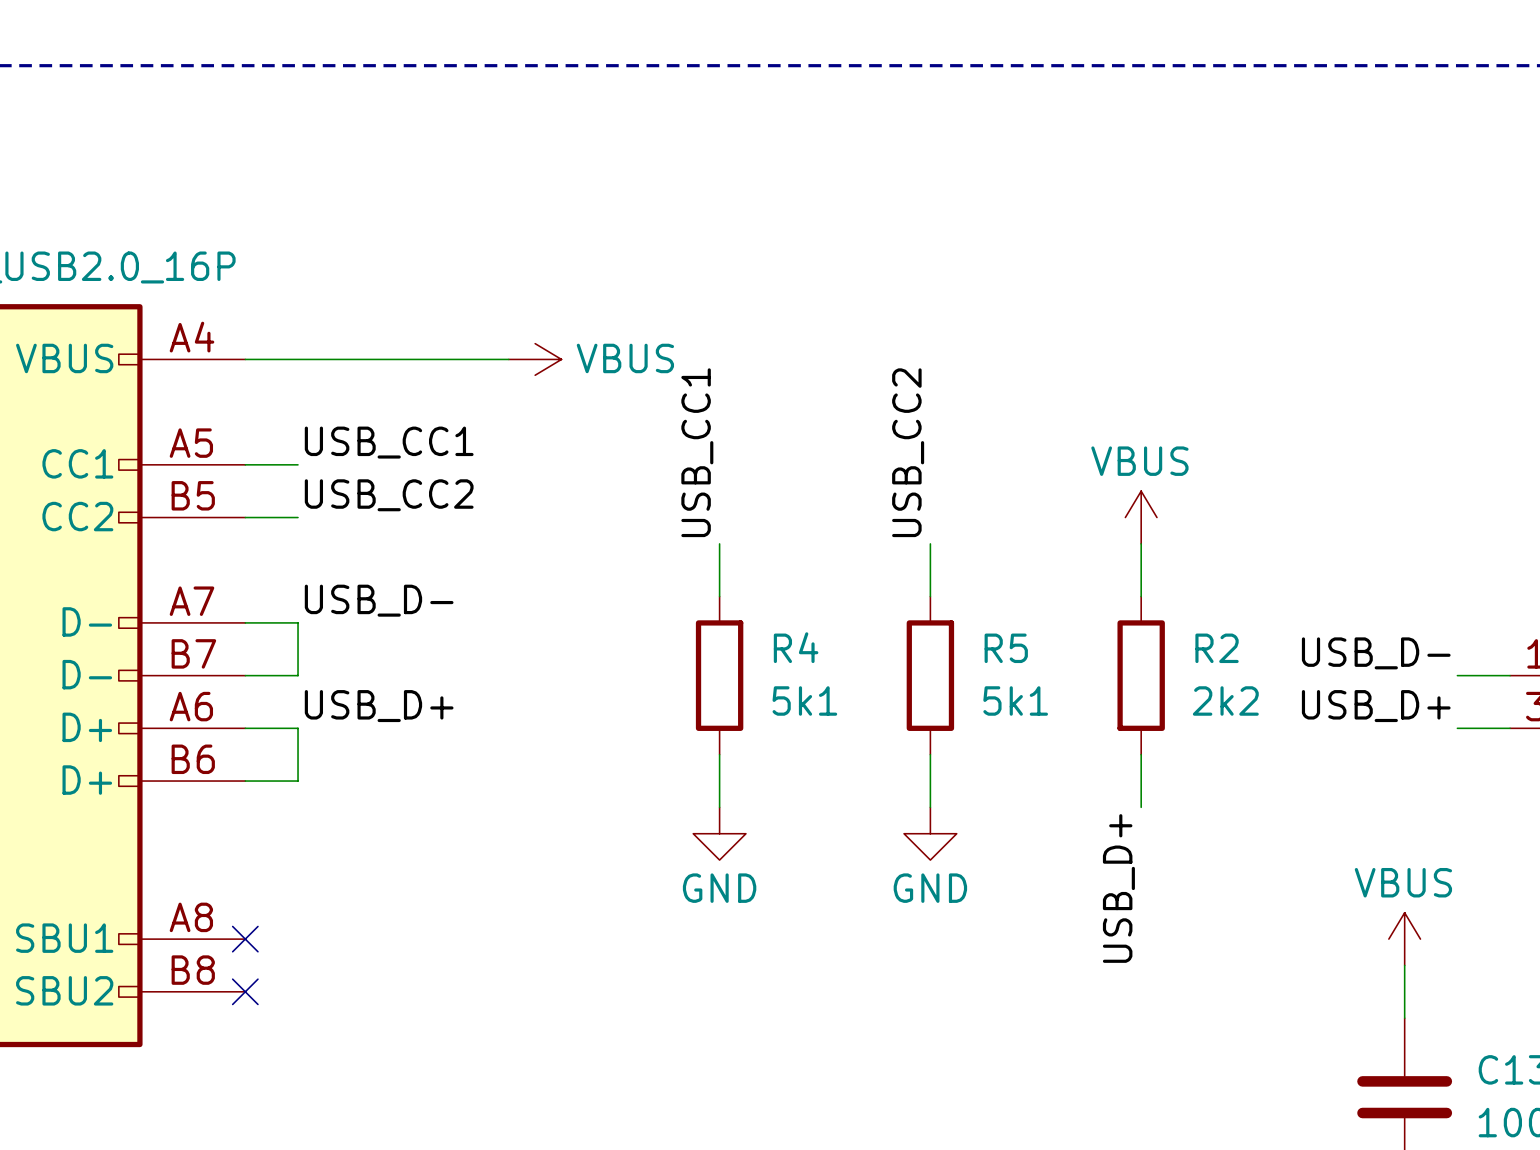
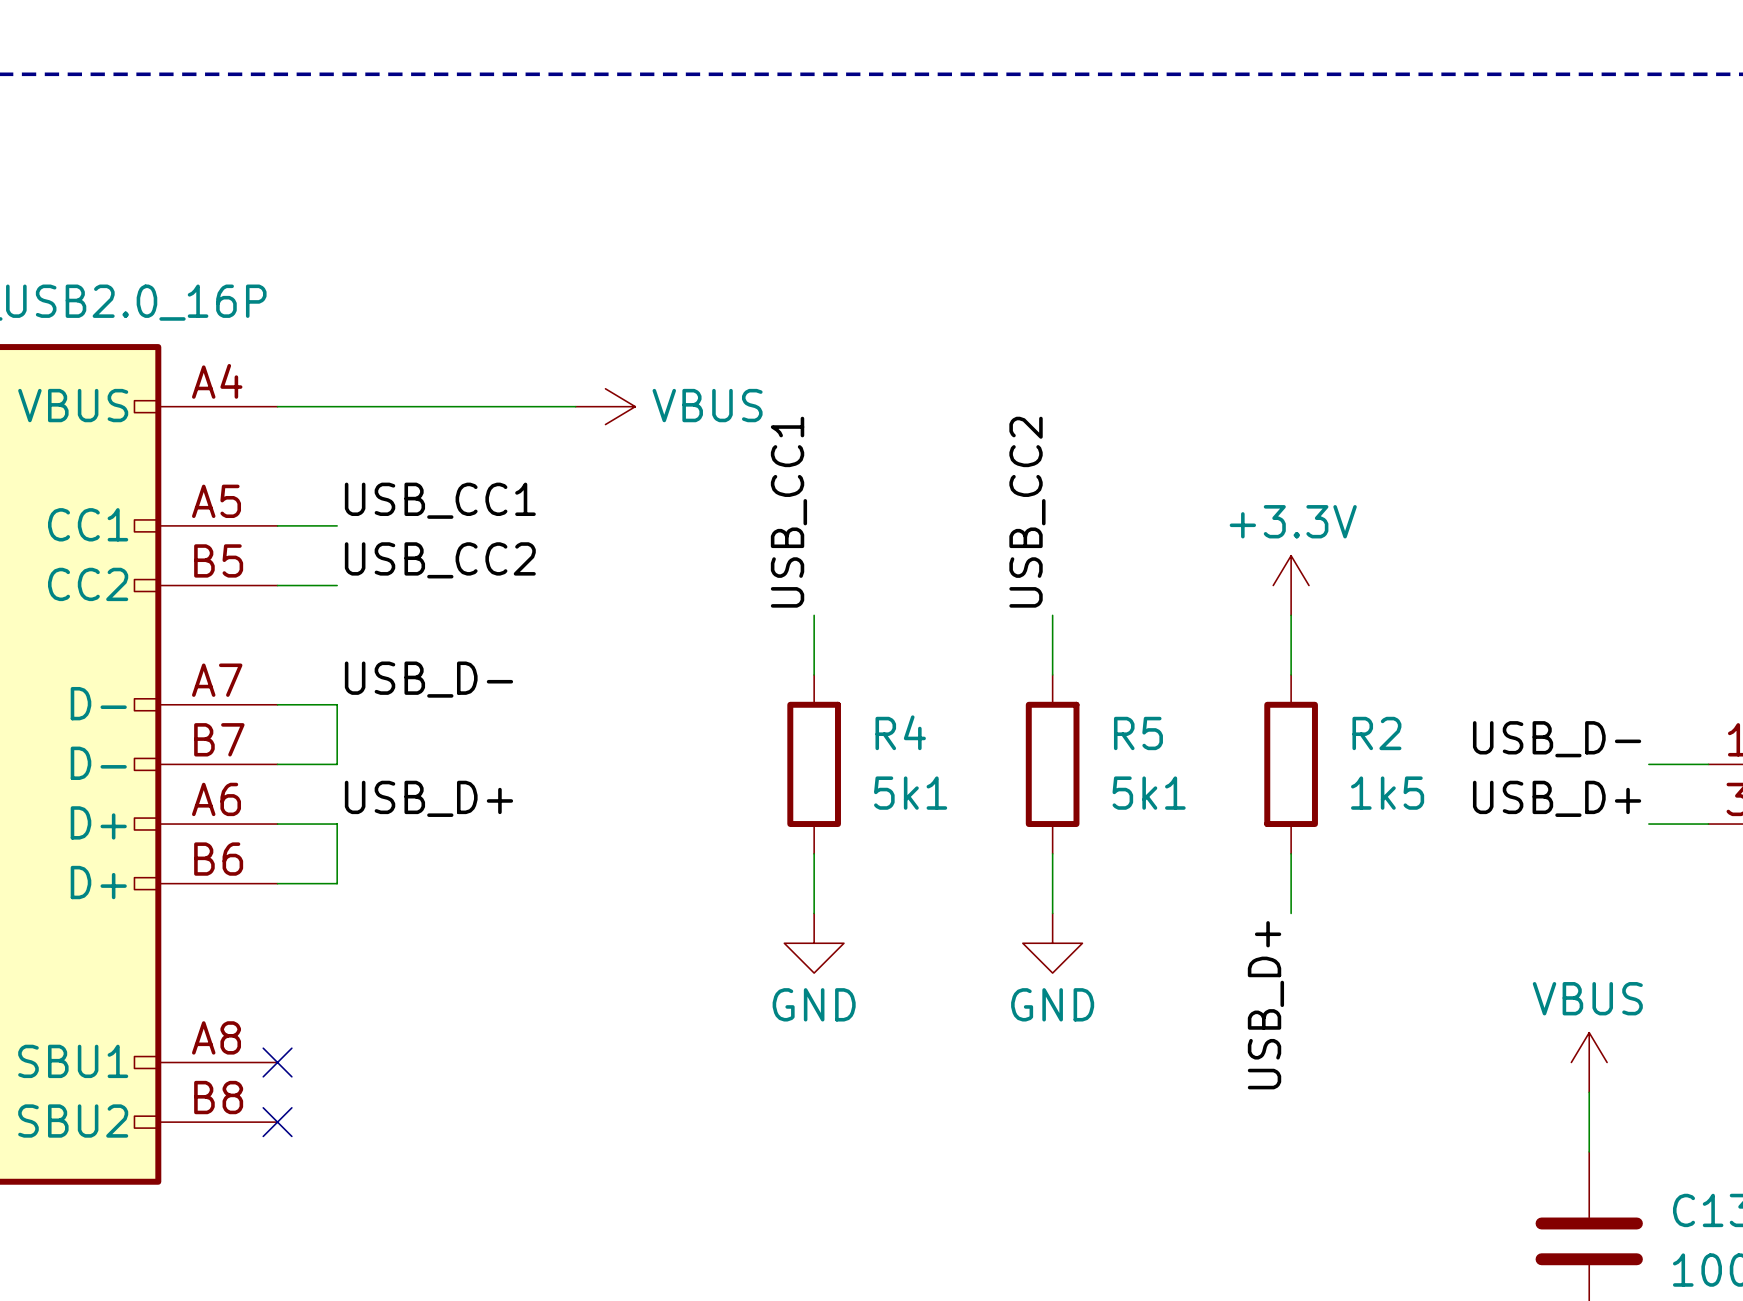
power symbol: VBUS (1141, 517) -> +3.3V (1291, 585)
R2 value: 2k2 (1225, 700) -> 1k5 (1387, 793)

